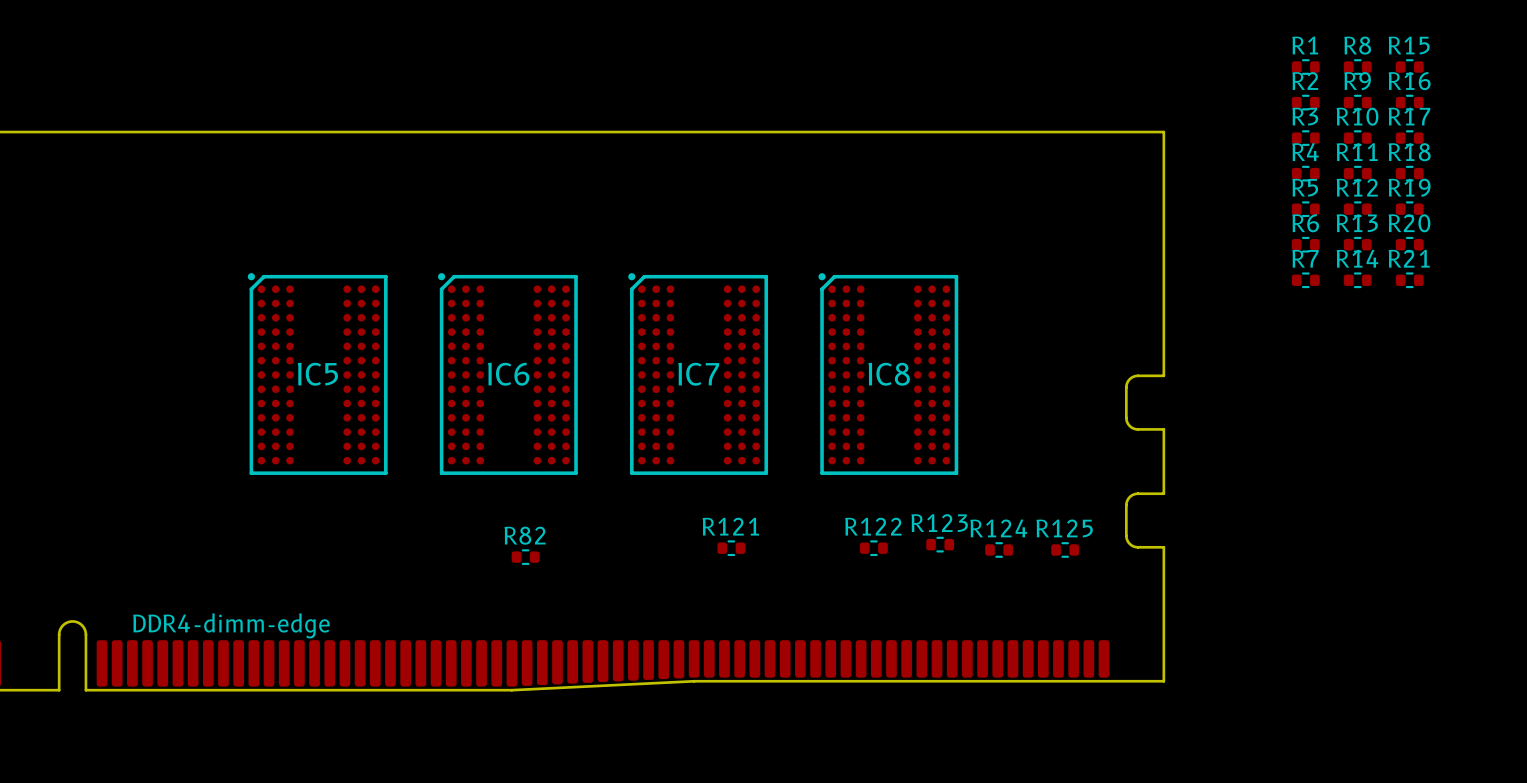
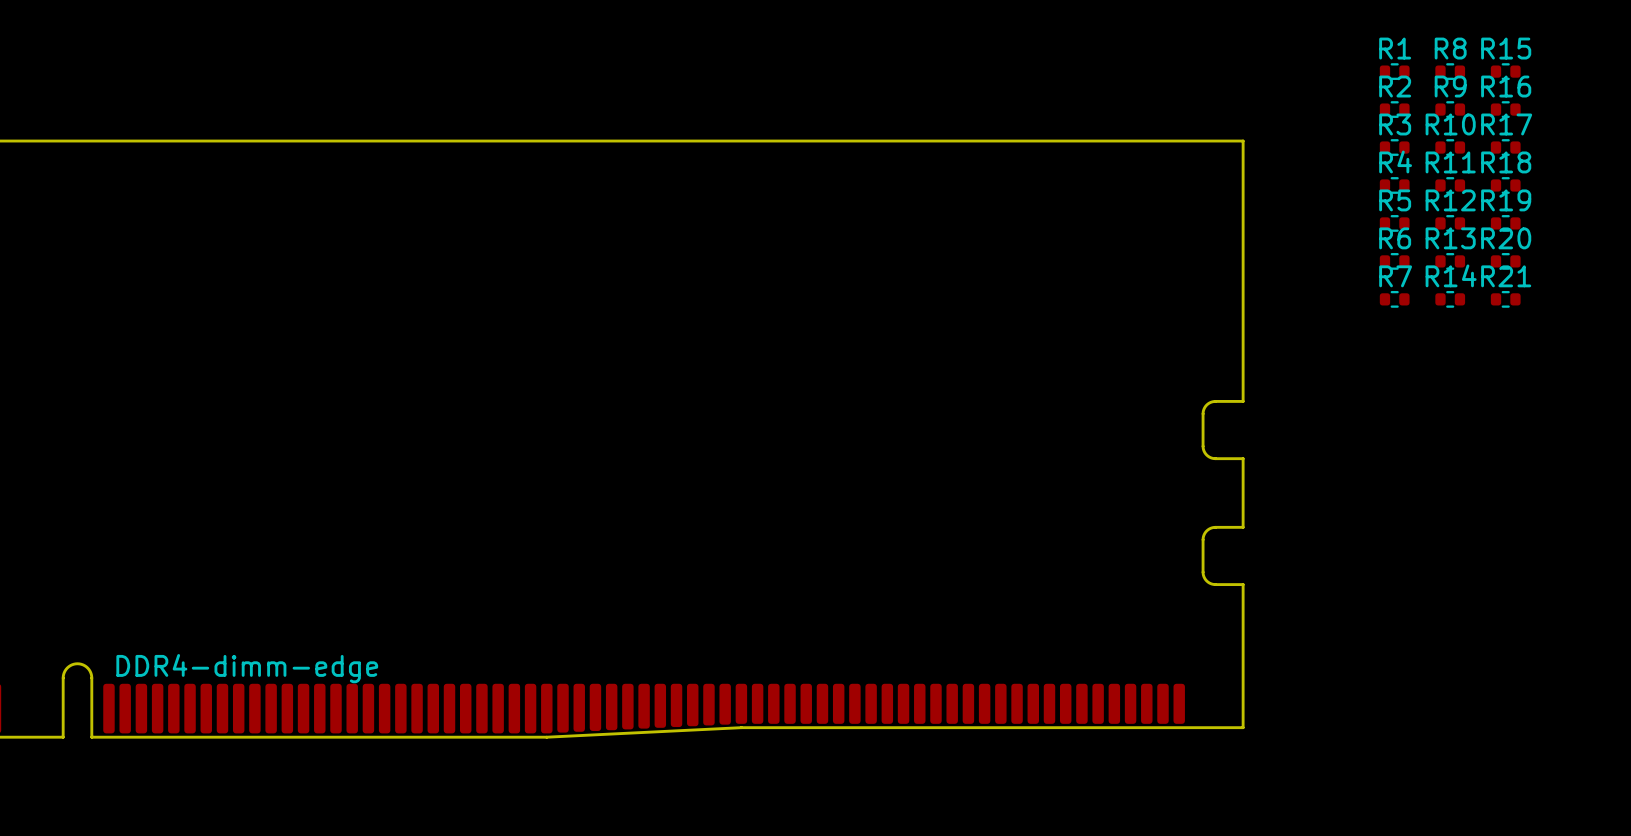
IC5: (317, 374) -> none
IC6: (507, 374) -> none
IC7: (698, 374) -> none
IC8: (888, 374) -> none
R123: (940, 544) -> none
R121: (731, 548) -> none
R122: (873, 548) -> none
R124: (999, 549) -> none
R125: (1065, 549) -> none
R82: (525, 557) -> none

